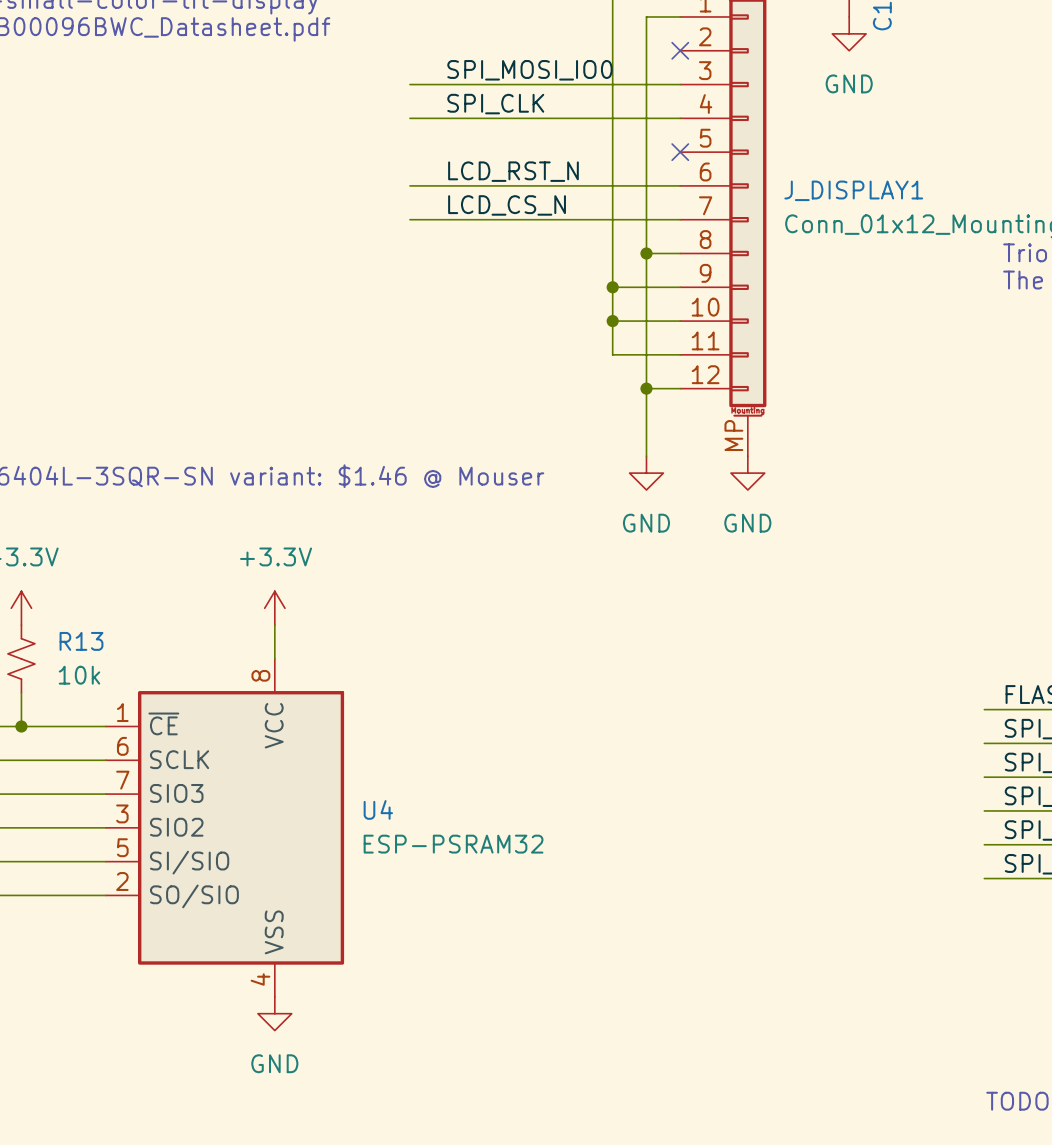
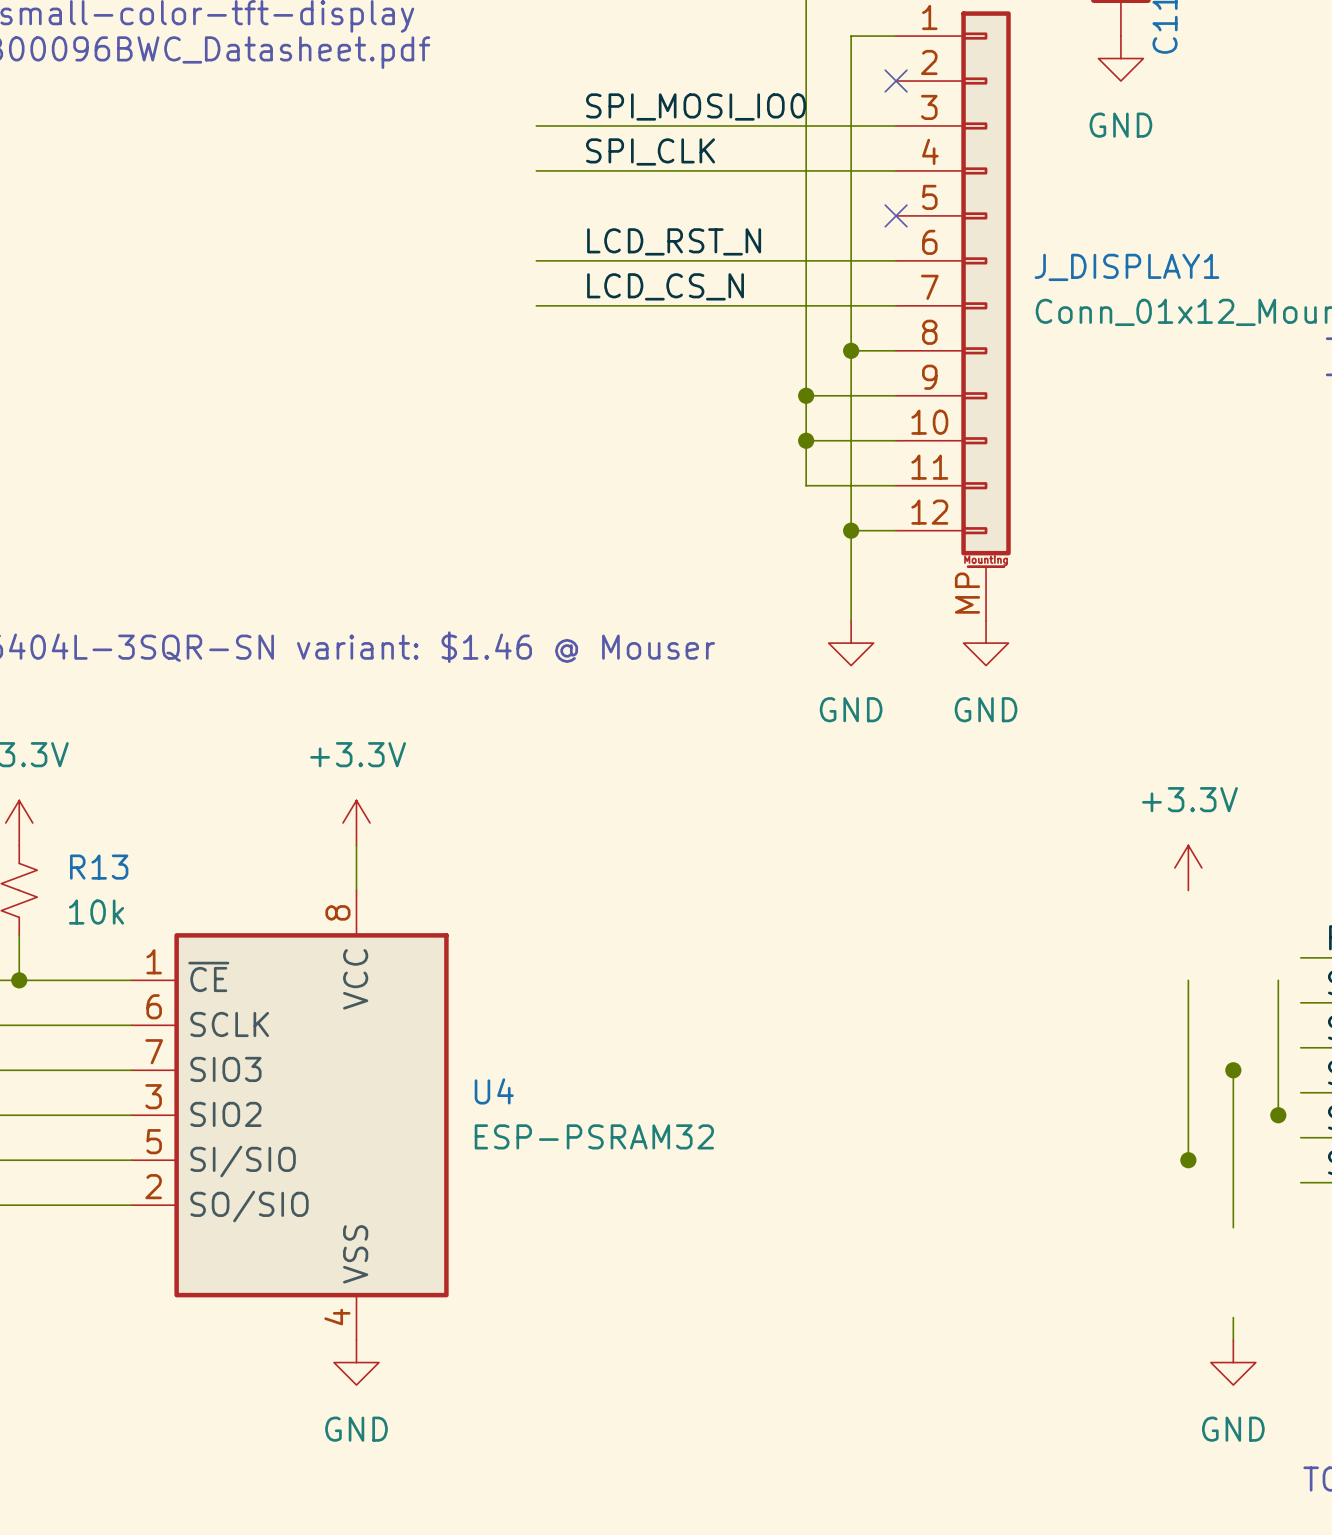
power symbol: none -> +3.3V (1188, 867)
wire: none -> (1188, 980) (1188, 1160)
wire: none -> (1278, 980) (1278, 1115)
wire: none -> (1233, 1070) (1233, 1227)
junction: none -> (1233, 1070)
junction: none -> (1278, 1115)
junction: none -> (1188, 1160)
wire: none -> (1233, 1317) (1233, 1340)
power symbol: none -> GND (1233, 1362)

